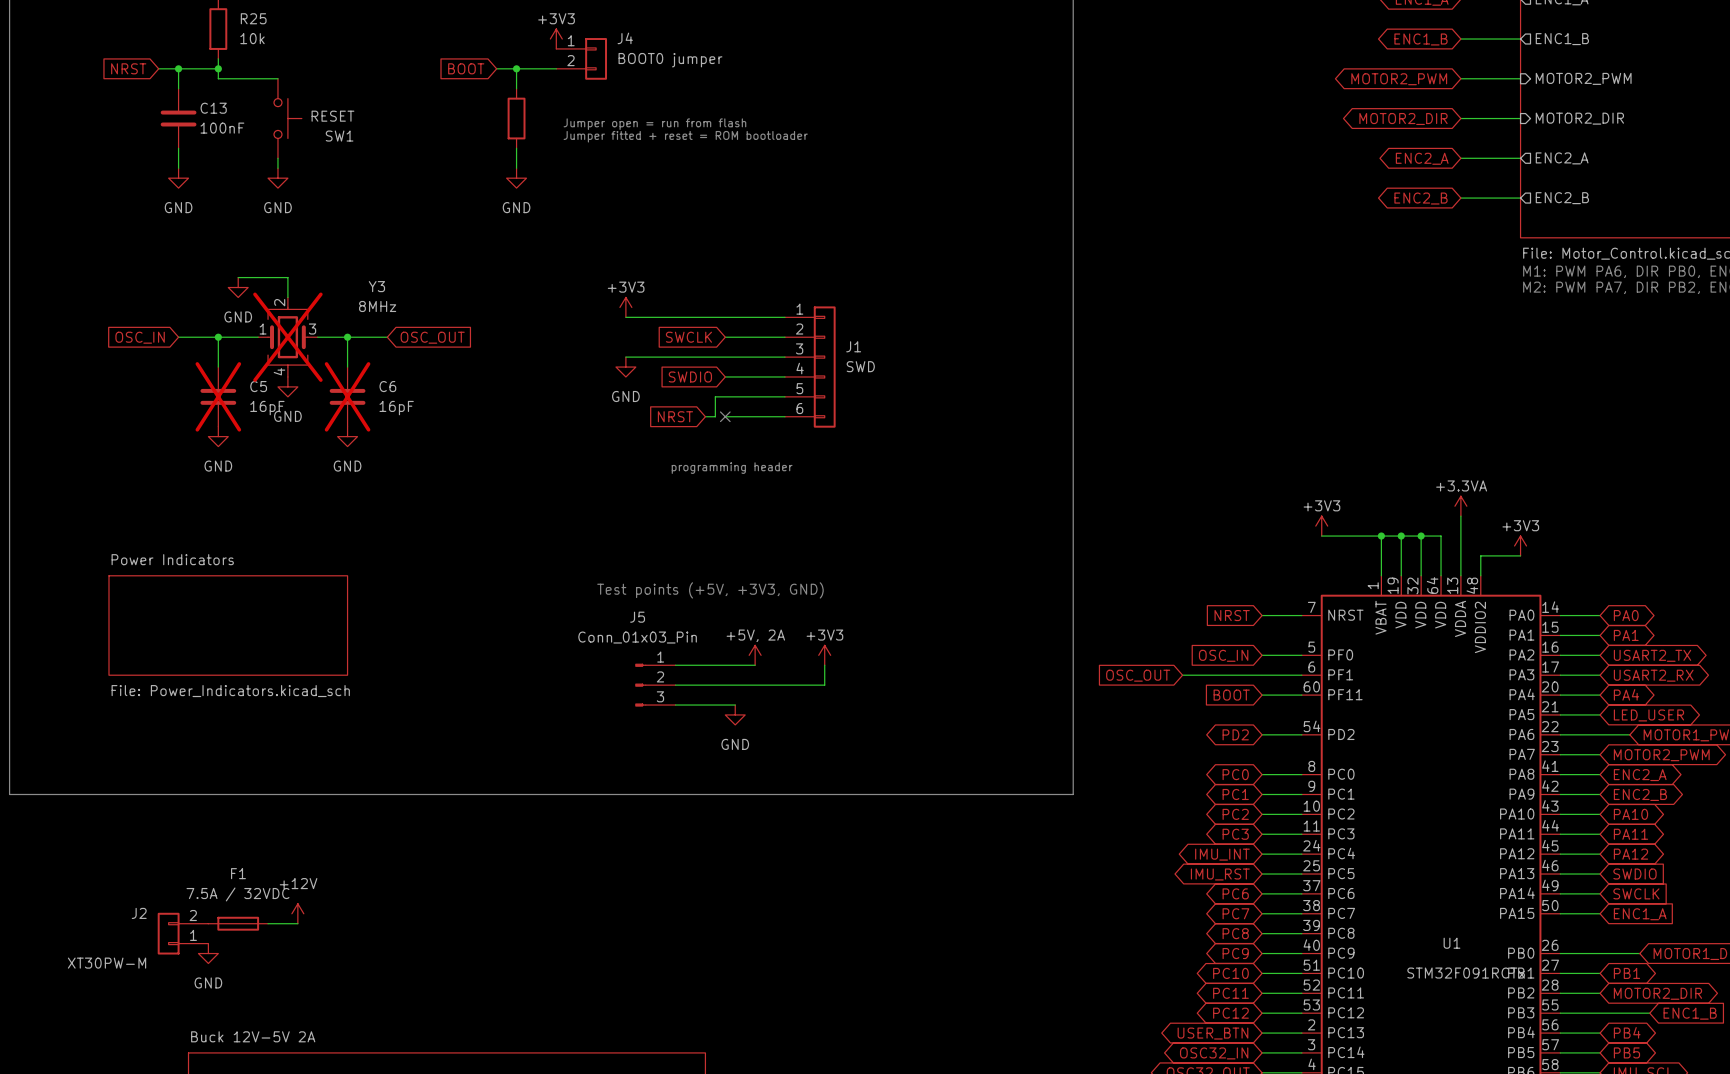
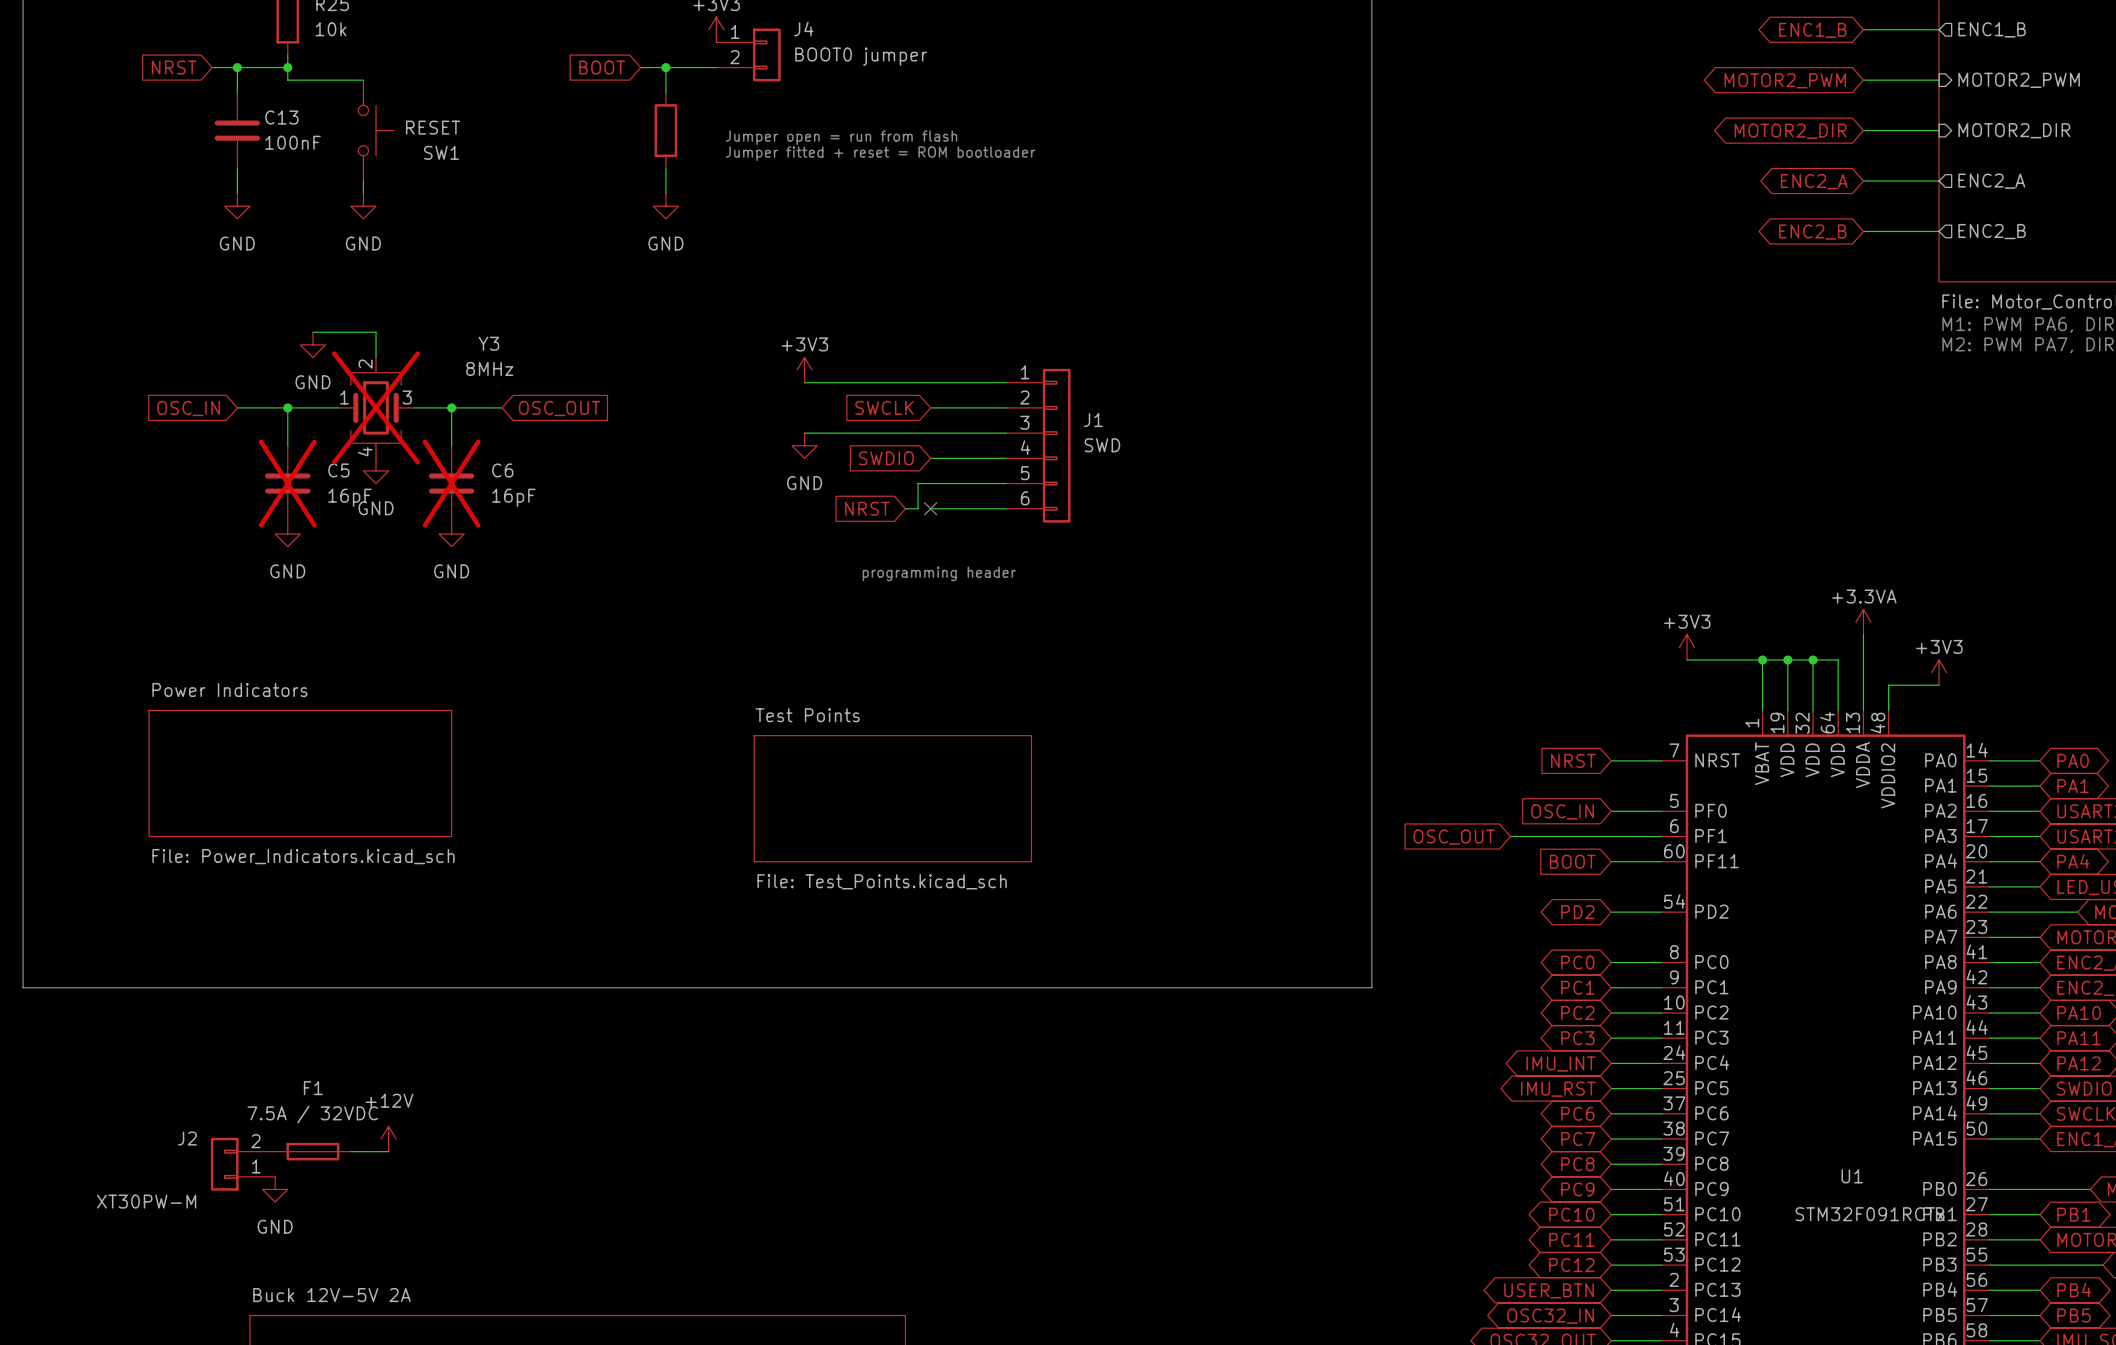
text: Test points (+5V, +3V3, GND) (710, 590) -> none
sheet Test Points: none -> File: Test_Points.kicad_sch (892, 798)
power symbol: +5V, 2A (755, 655) -> none
power symbol: +3V3 (824, 655) -> none
wire: (675, 665) (755, 665) -> none
wire: (824, 665) (824, 685) (675, 685) -> none
J5: Conn_01x03_Pin (655, 685) -> none
wire: (675, 705) (735, 705) -> none
power symbol: GND (735, 714) -> none

